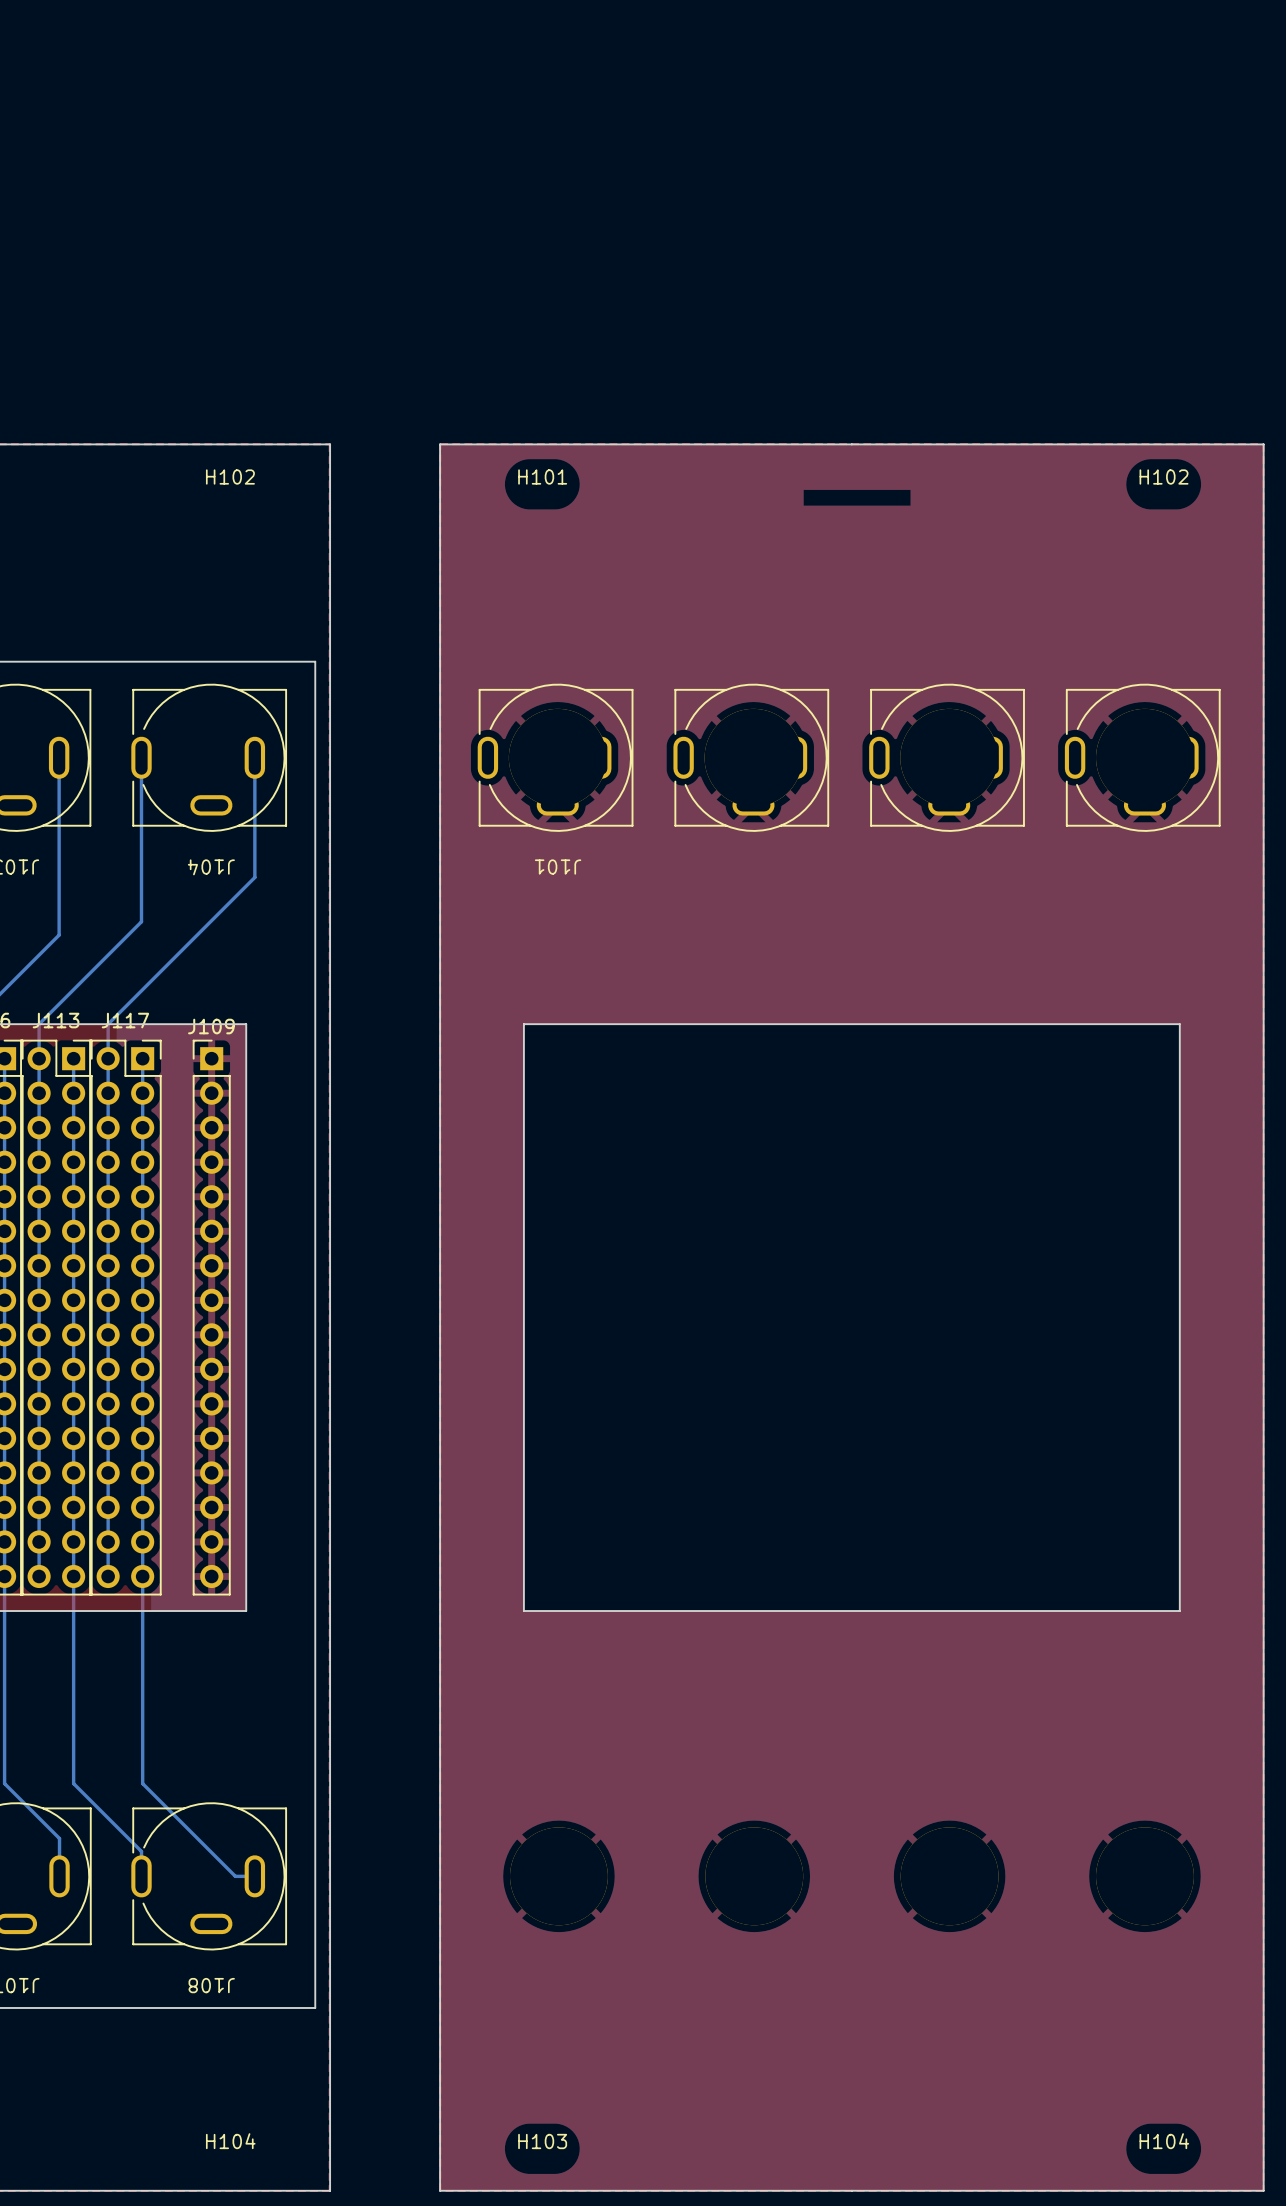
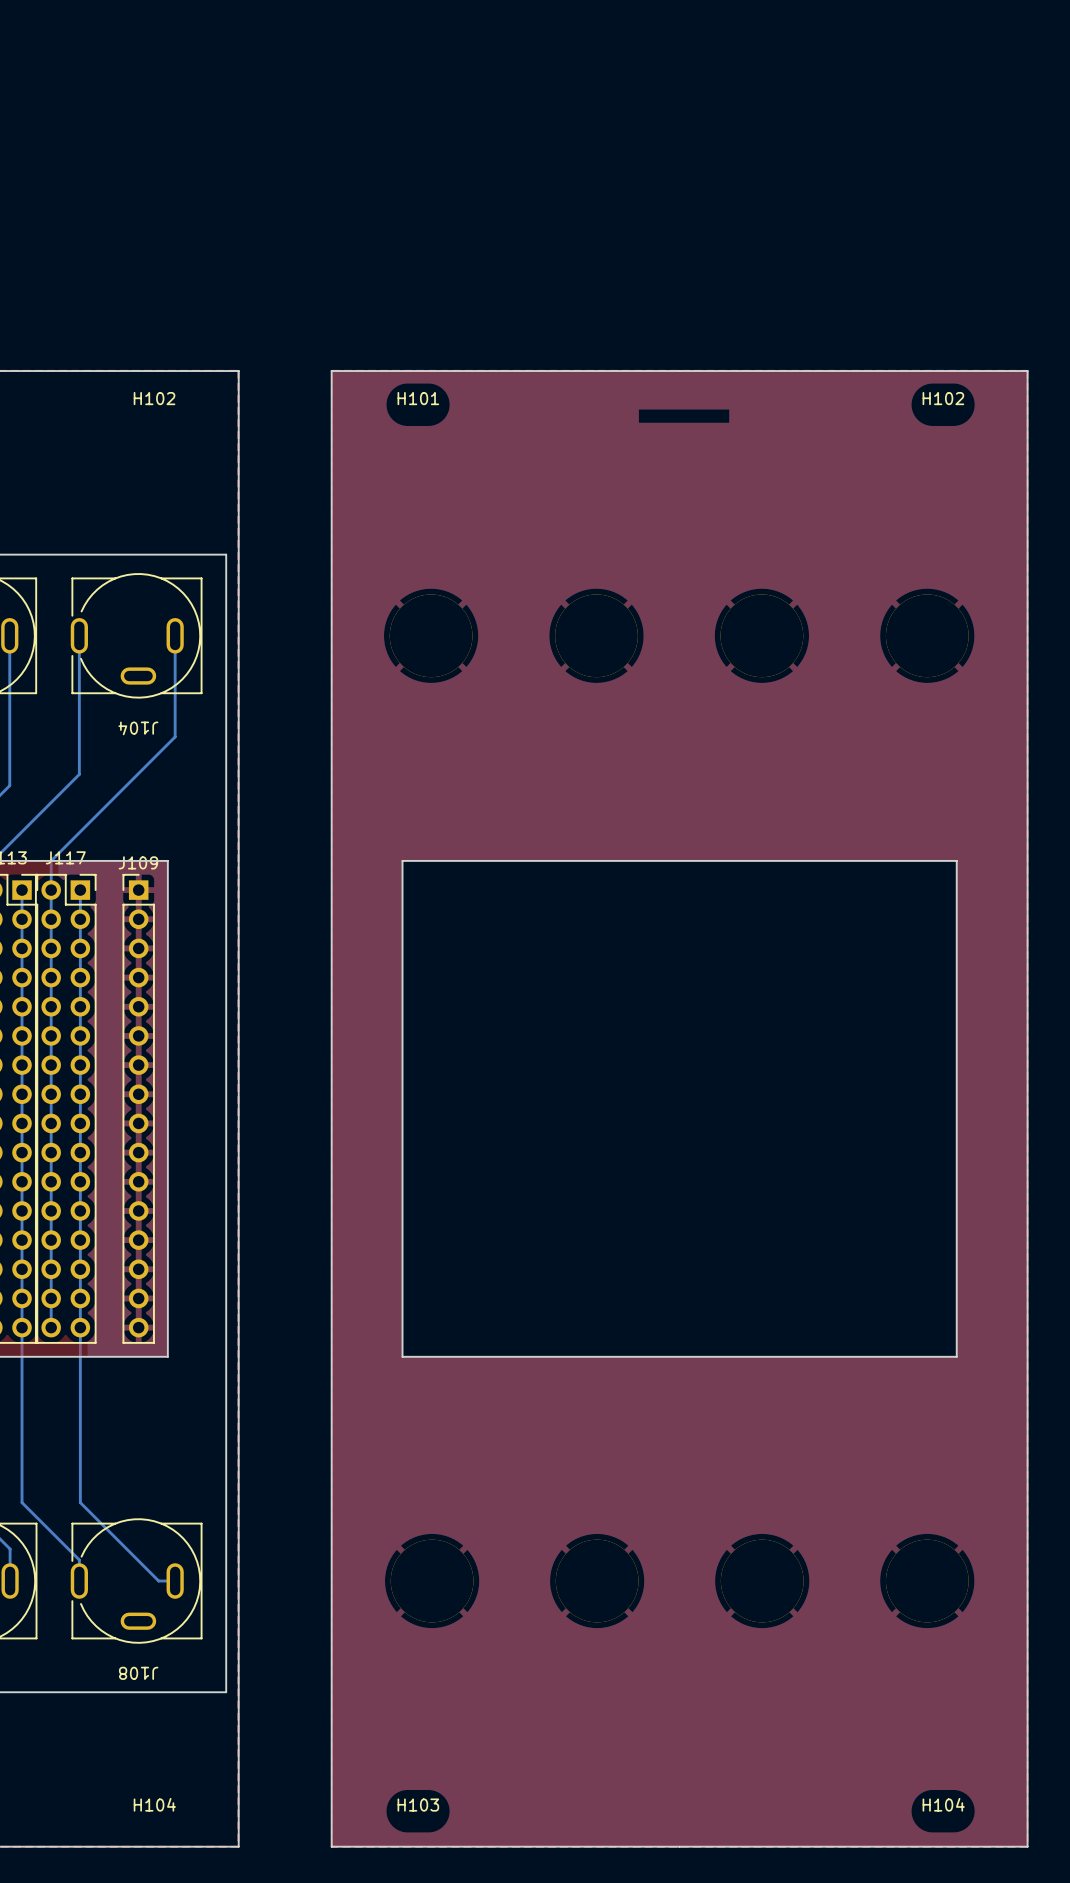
J101: (555, 757) -> none
part: (751, 757) -> none
part: (946, 757) -> none
part: (1142, 757) -> none

